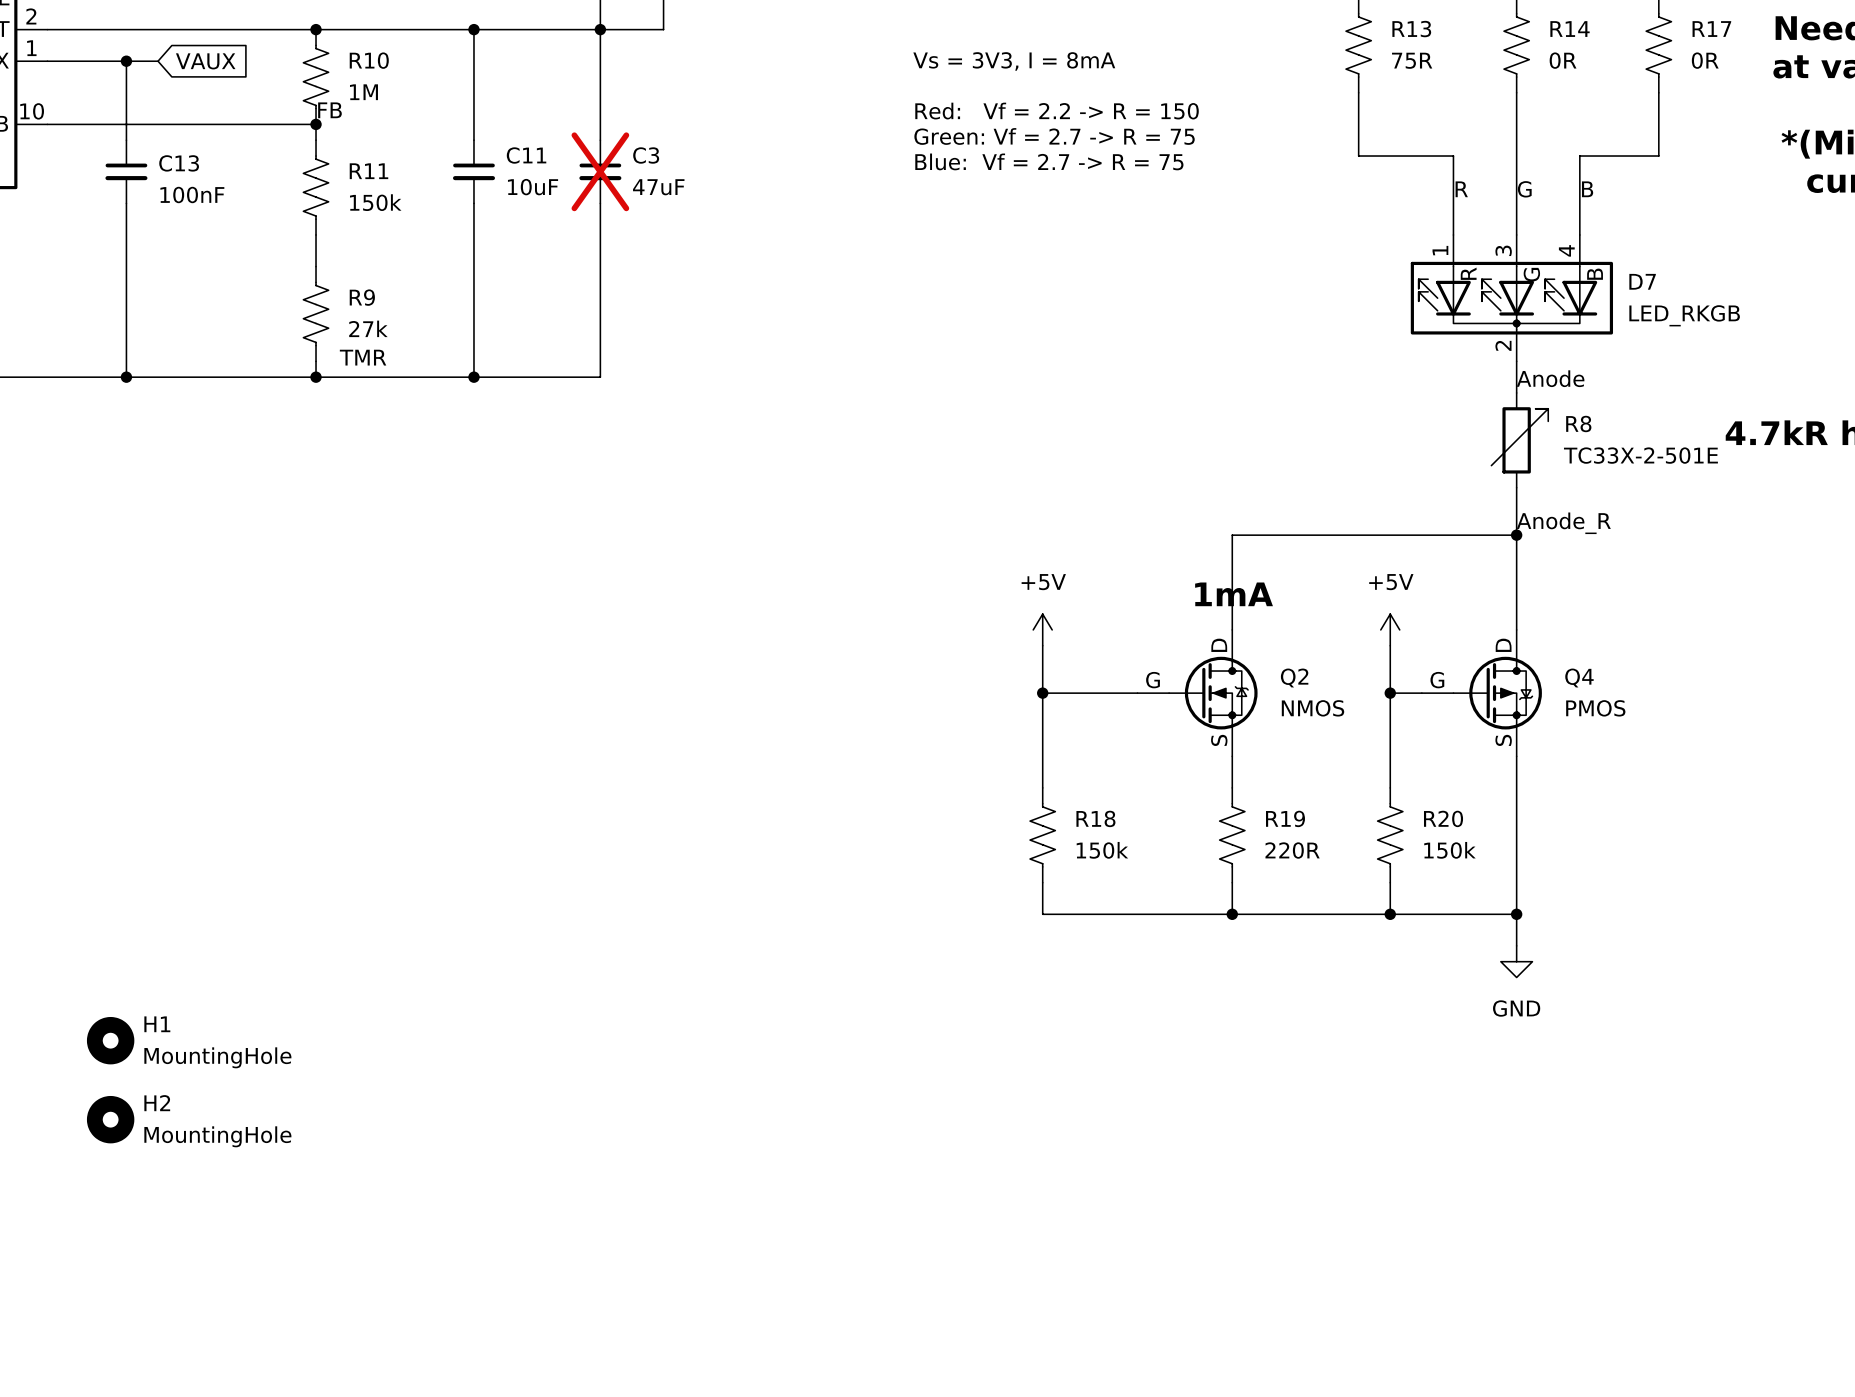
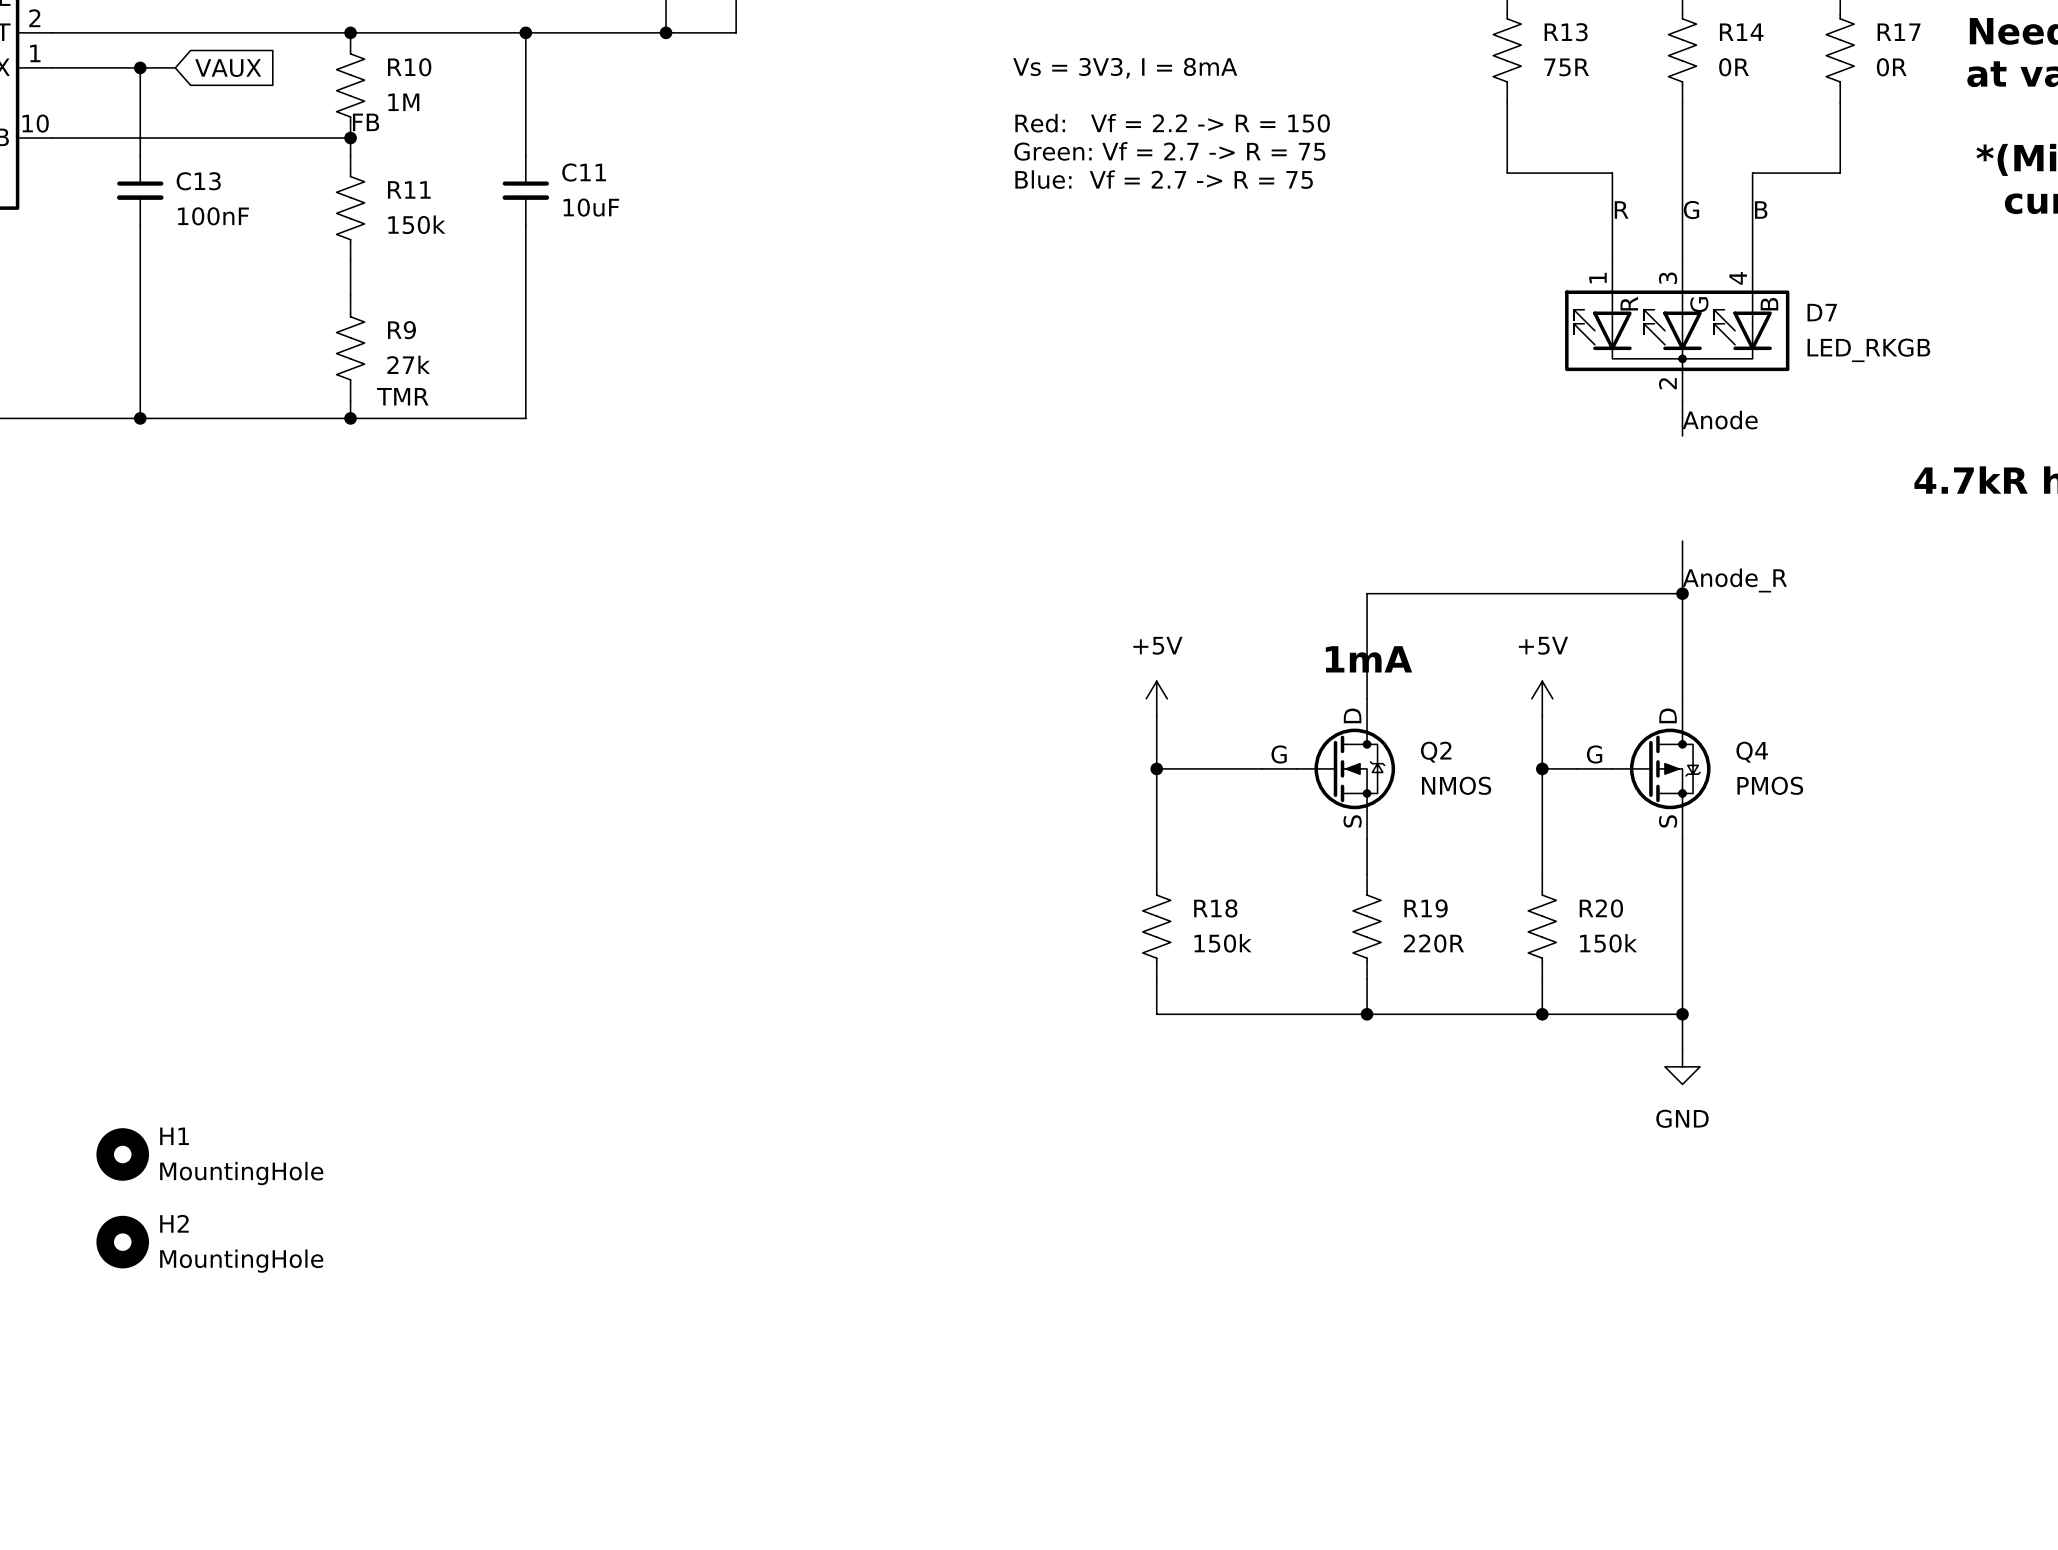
wire: (600, 29) (600, 140) -> none
C3: 47uF (600, 171) -> none
wire: (600, 203) (600, 377) (473, 377) -> none
junction: (473, 377) -> none
R8: TC33X-2-501E (1519, 440) -> none

